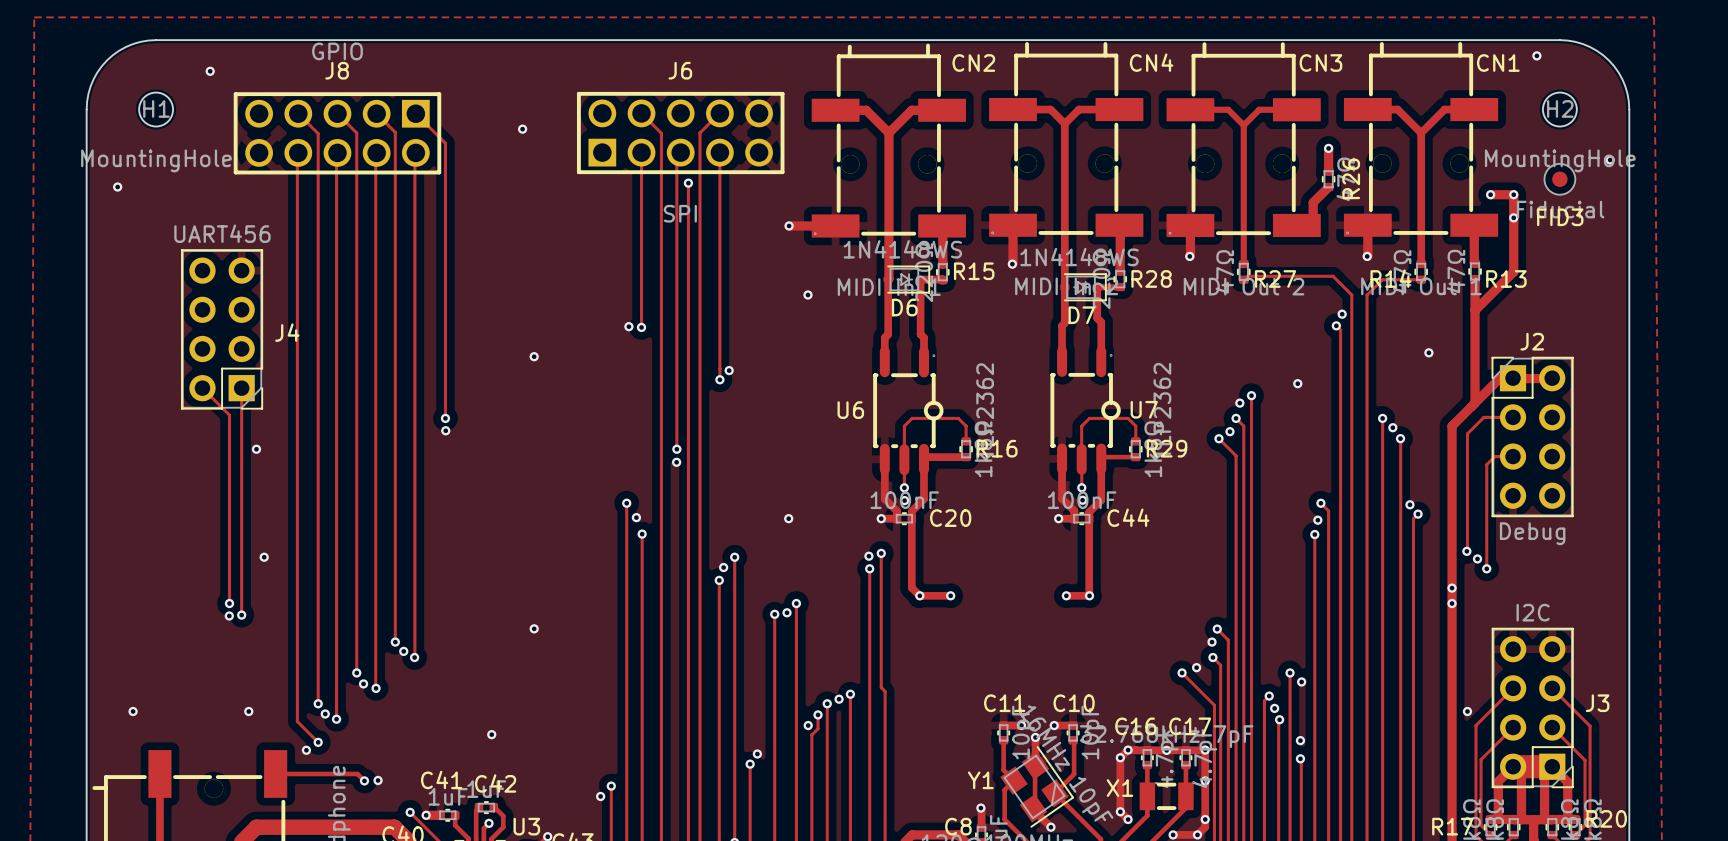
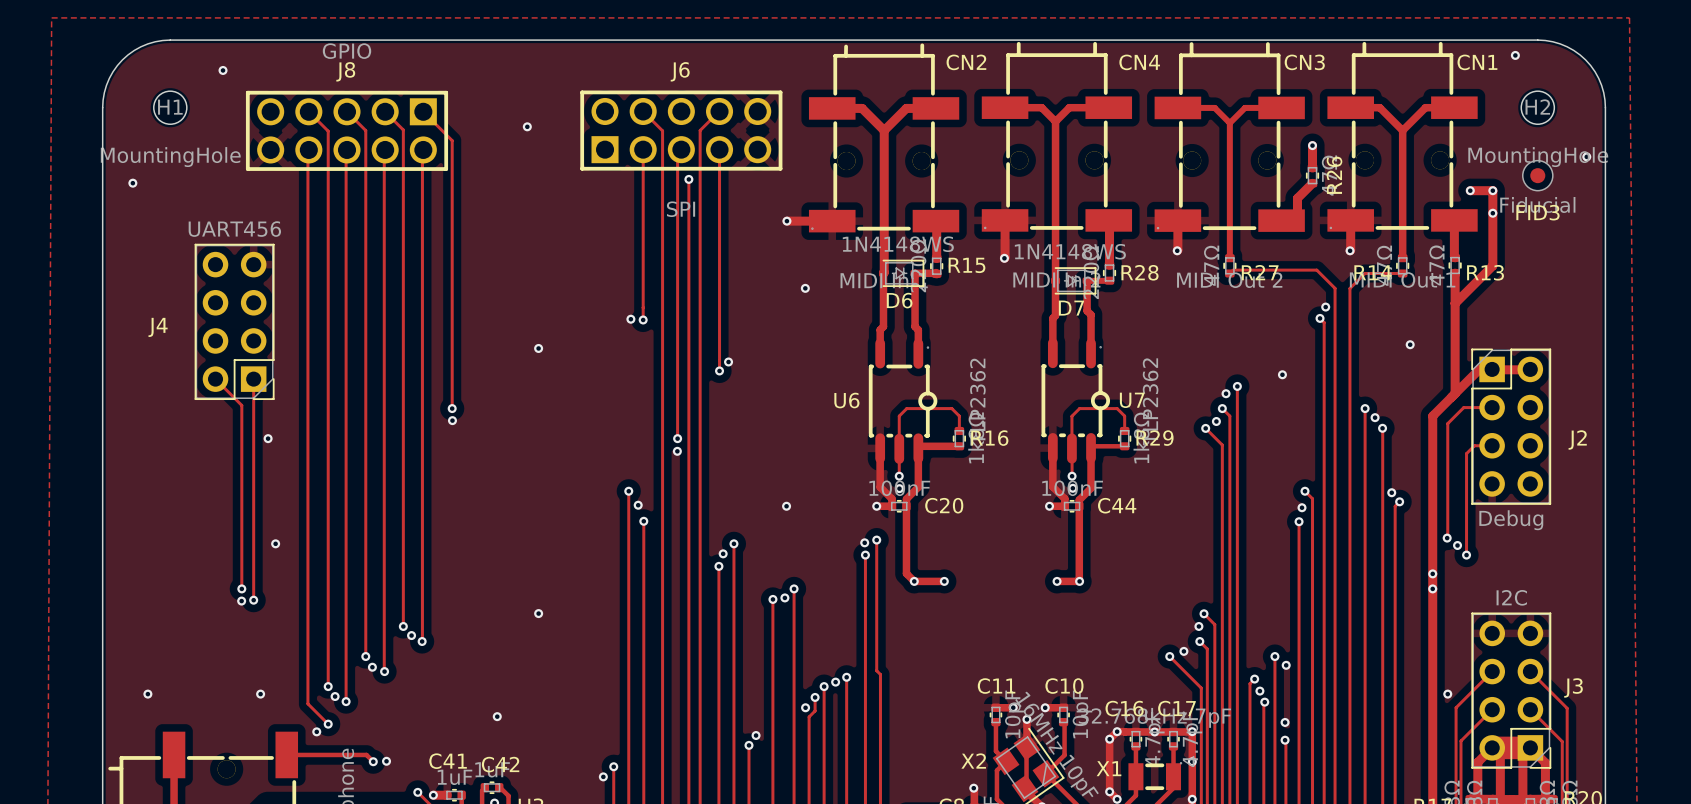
J4 name position: J4 (287, 332) -> J4 (158, 327)
J2 name position: J2 (1532, 341) -> J2 (1577, 440)
Y1 name: Y1 (980, 780) -> X2 (973, 761)

